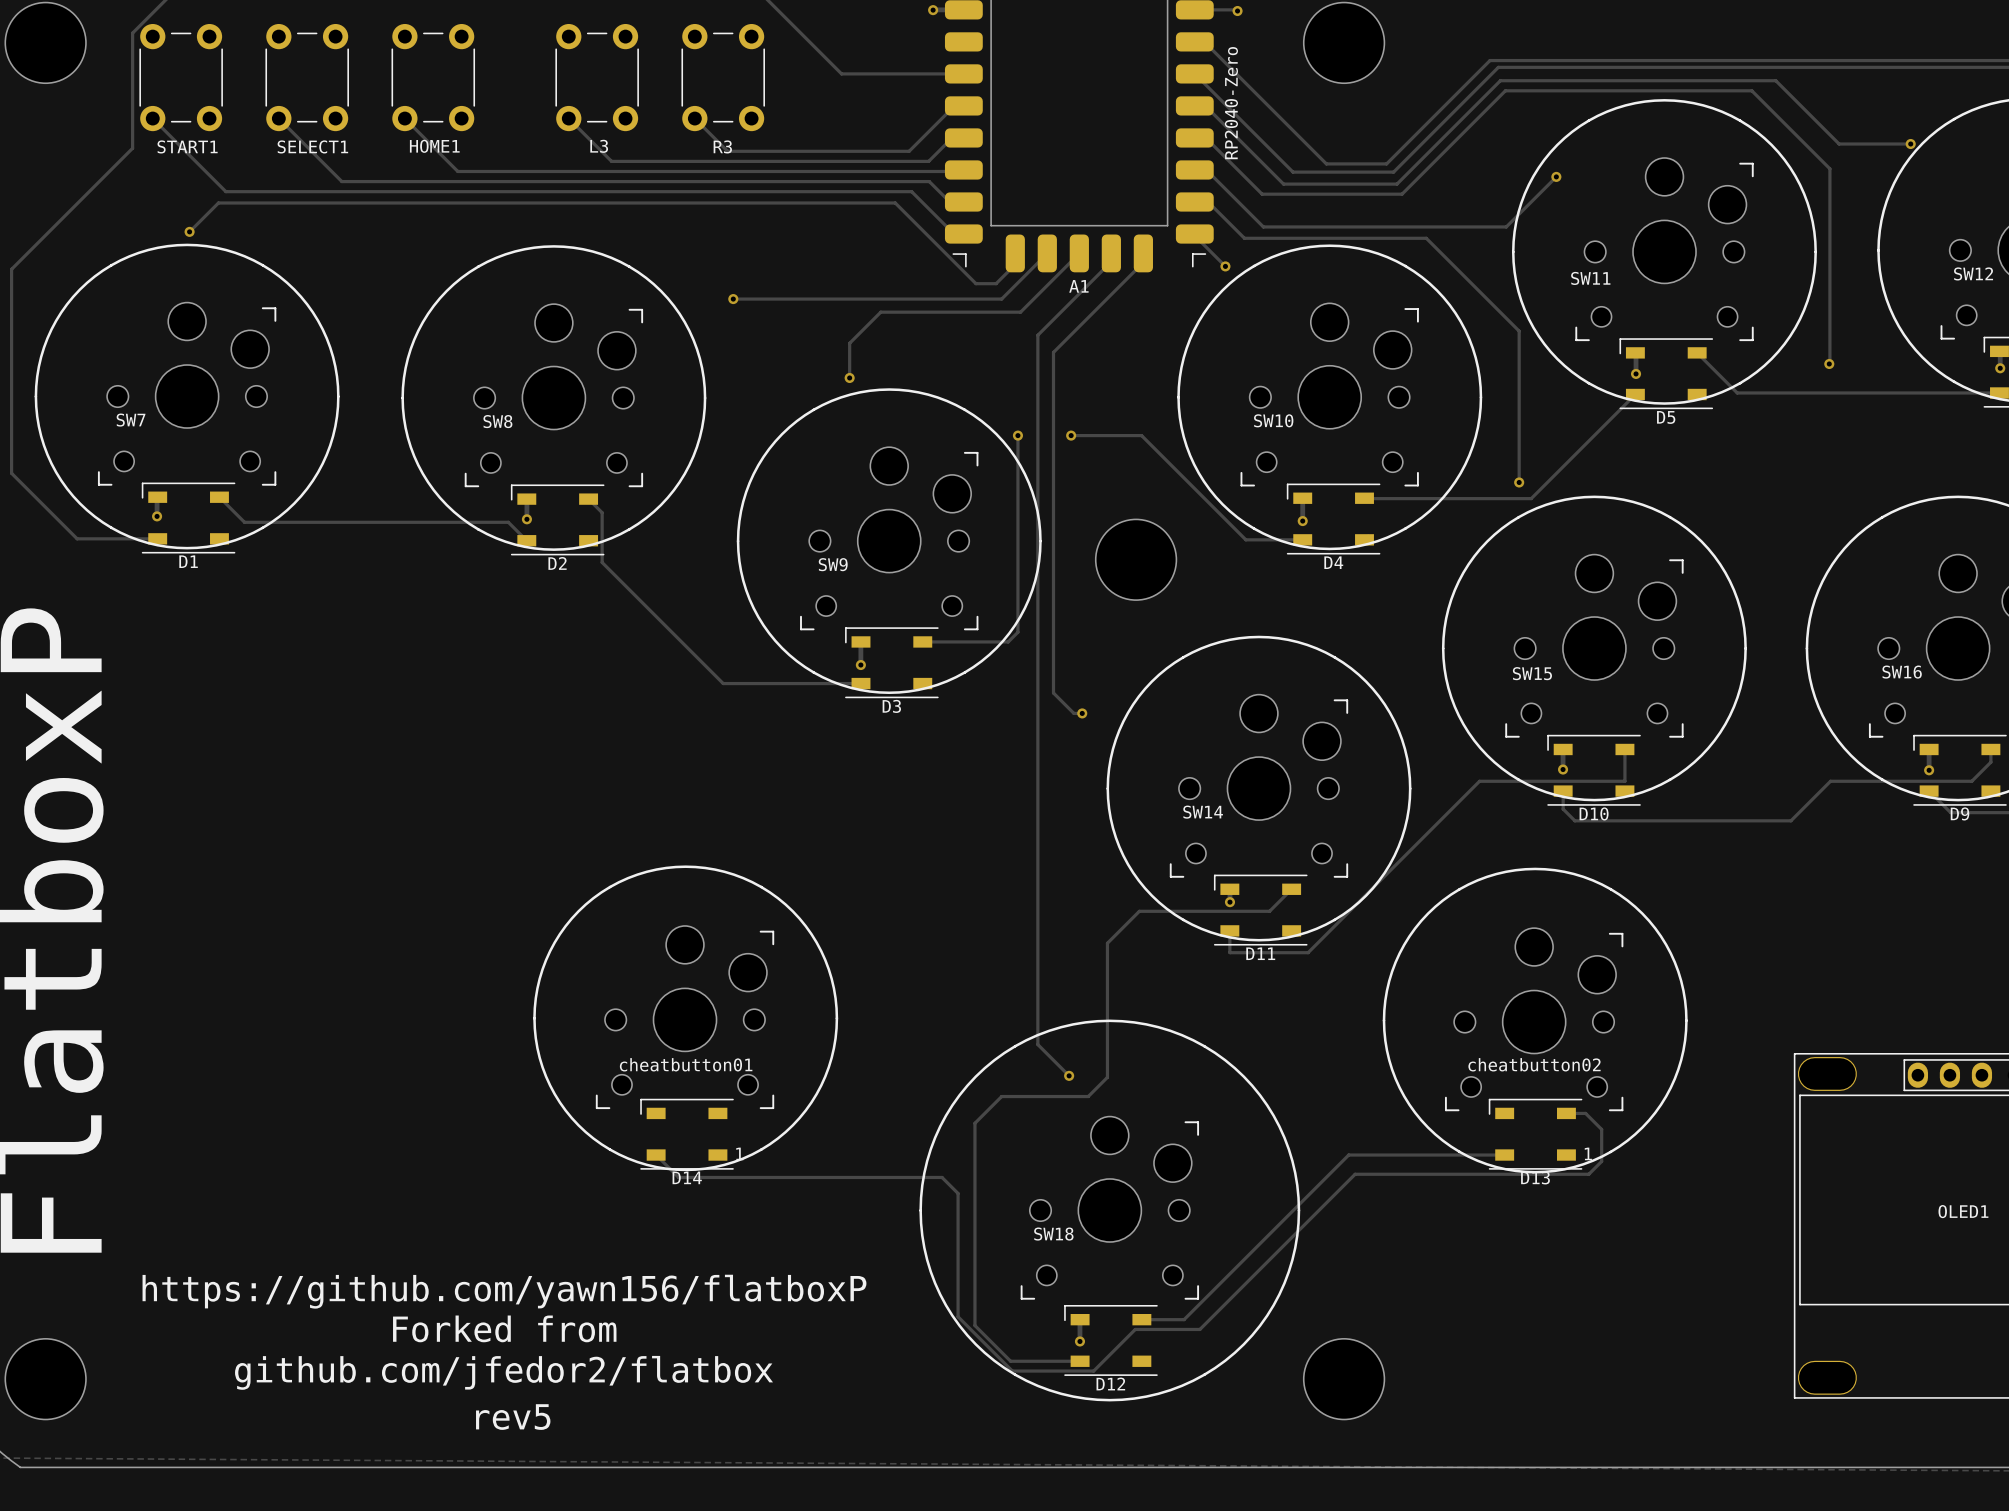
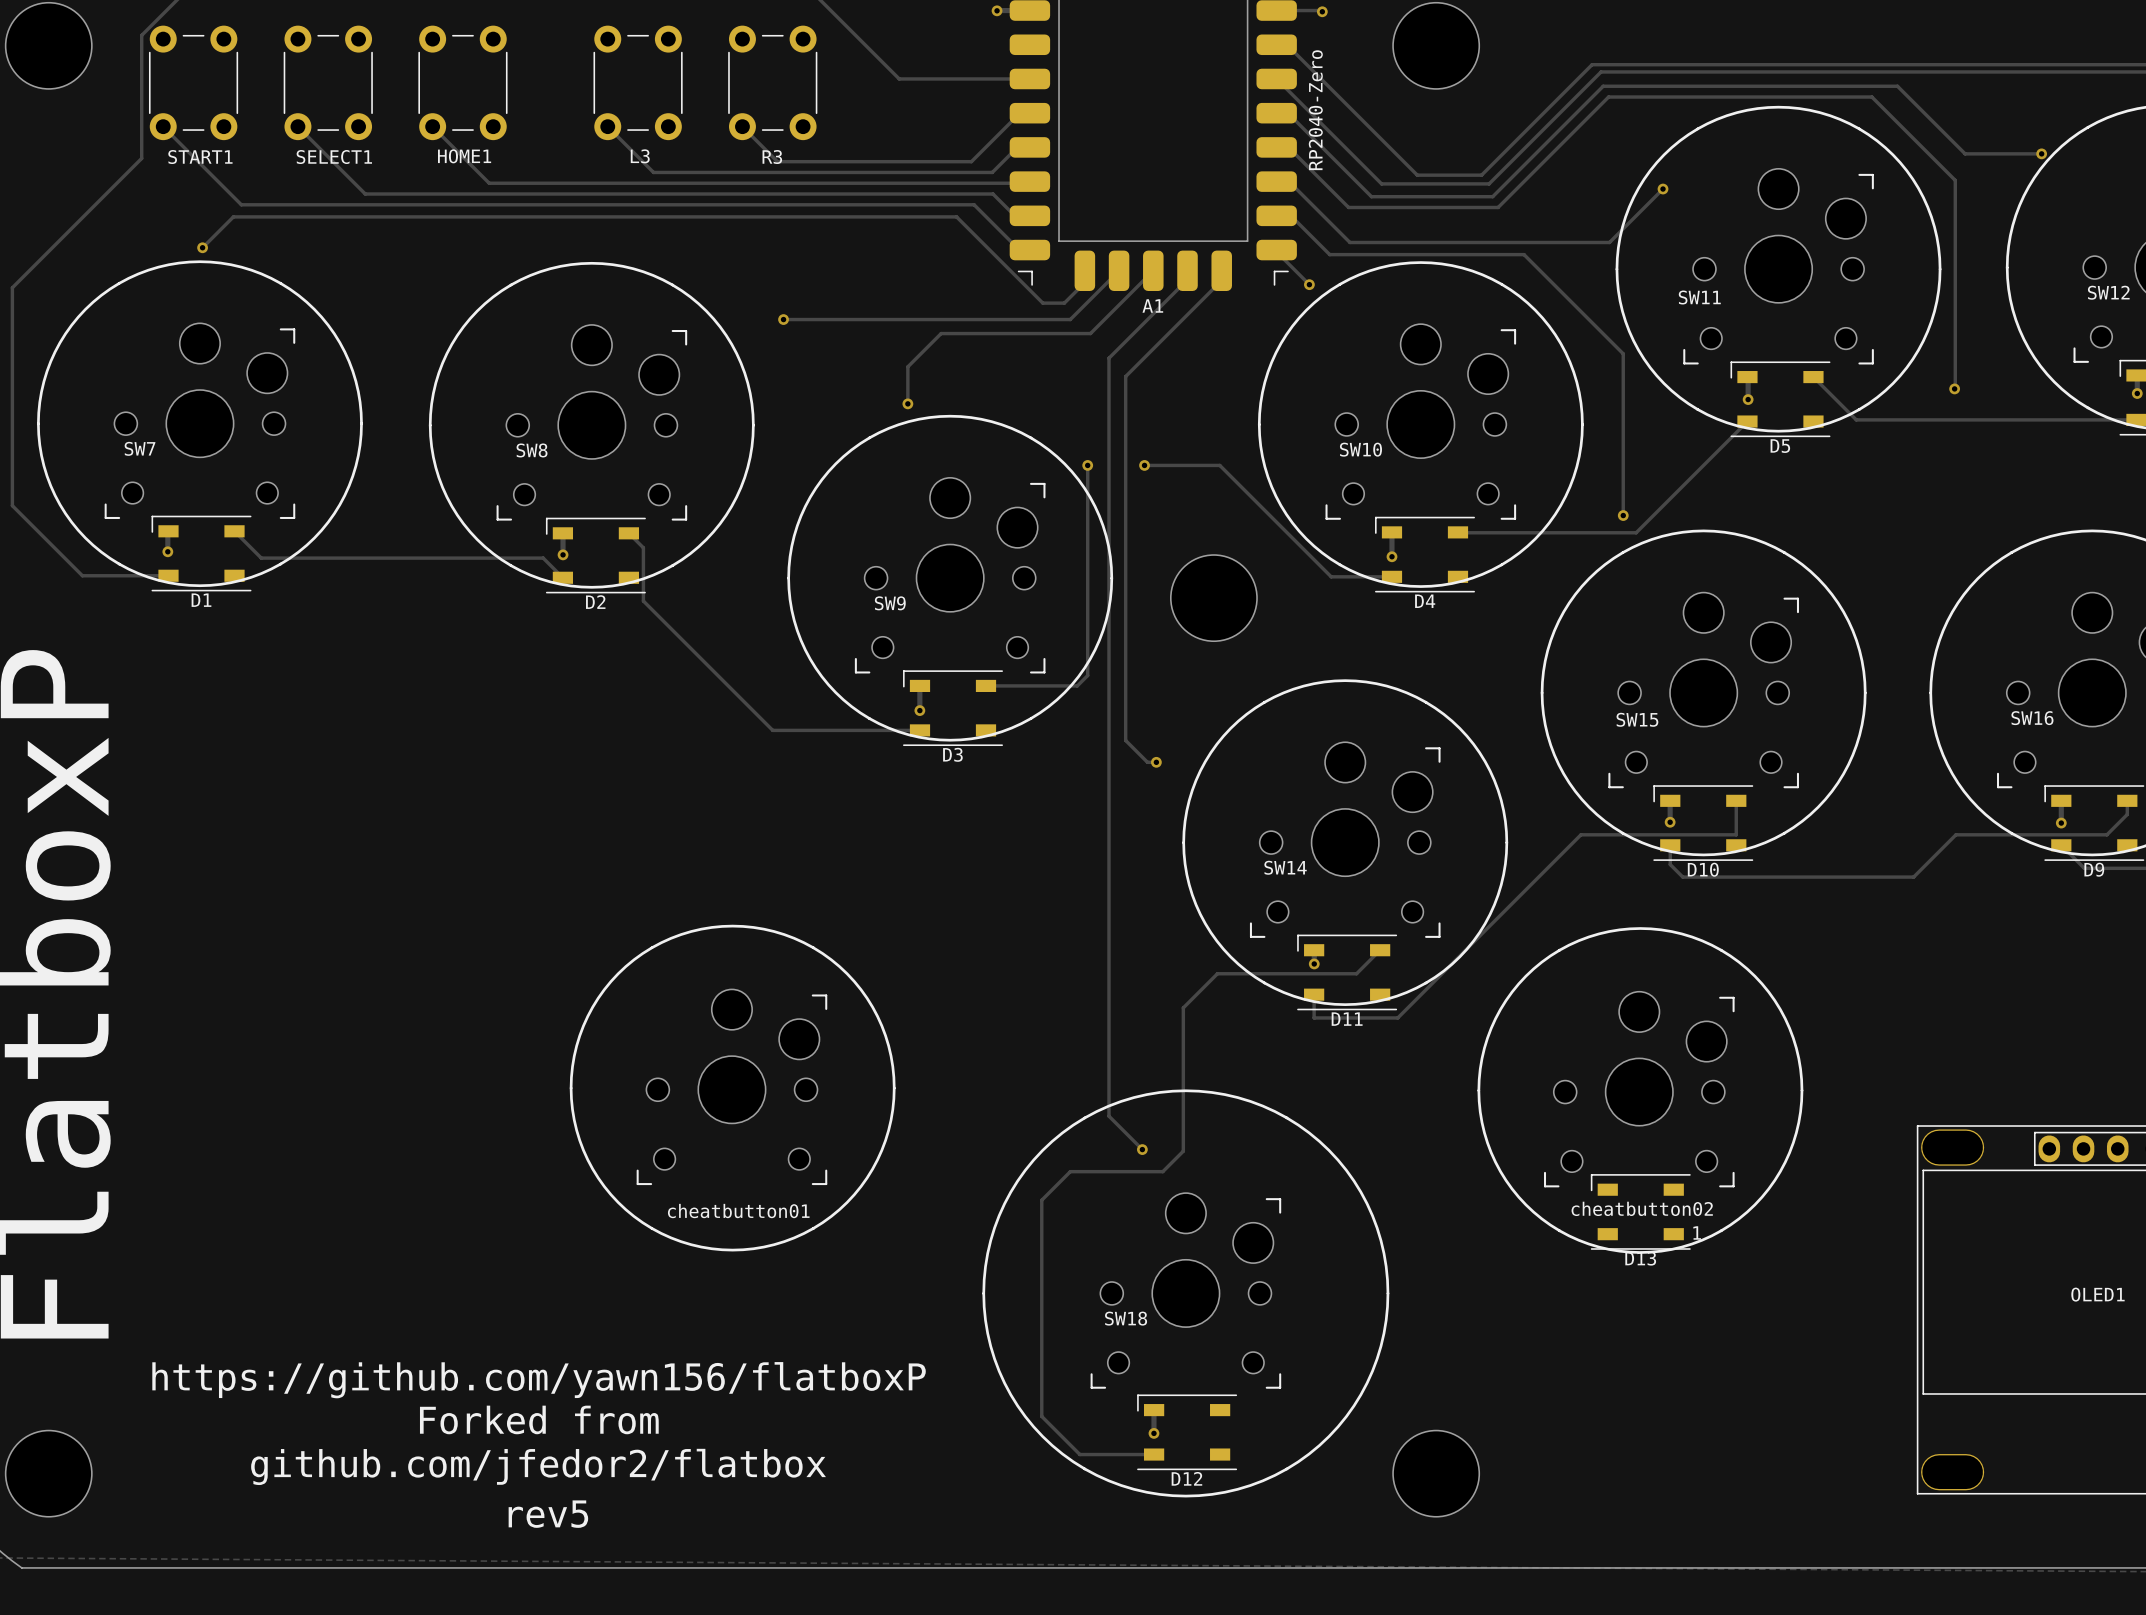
cheatbutton01 name position: cheatbutton01 (686, 1064) -> cheatbutton01 (738, 1211)
cheatbutton02 name position: cheatbutton02 (1534, 1064) -> cheatbutton02 (1642, 1208)
track: (1566, 1116) (1566, 1113) (1585, 1113) (1601, 1129) (1601, 1161) (1588, 1174) (1355, 1174) (1199, 1329) (1135, 1329) (1093, 1371) (1012, 1371) (958, 1316) (958, 1193) (942, 1177) (678, 1177) (656, 1155) -> none
D14: (687, 1134) -> none
track: (1504, 1155) (1348, 1155) (1184, 1319) (1141, 1319) -> none

